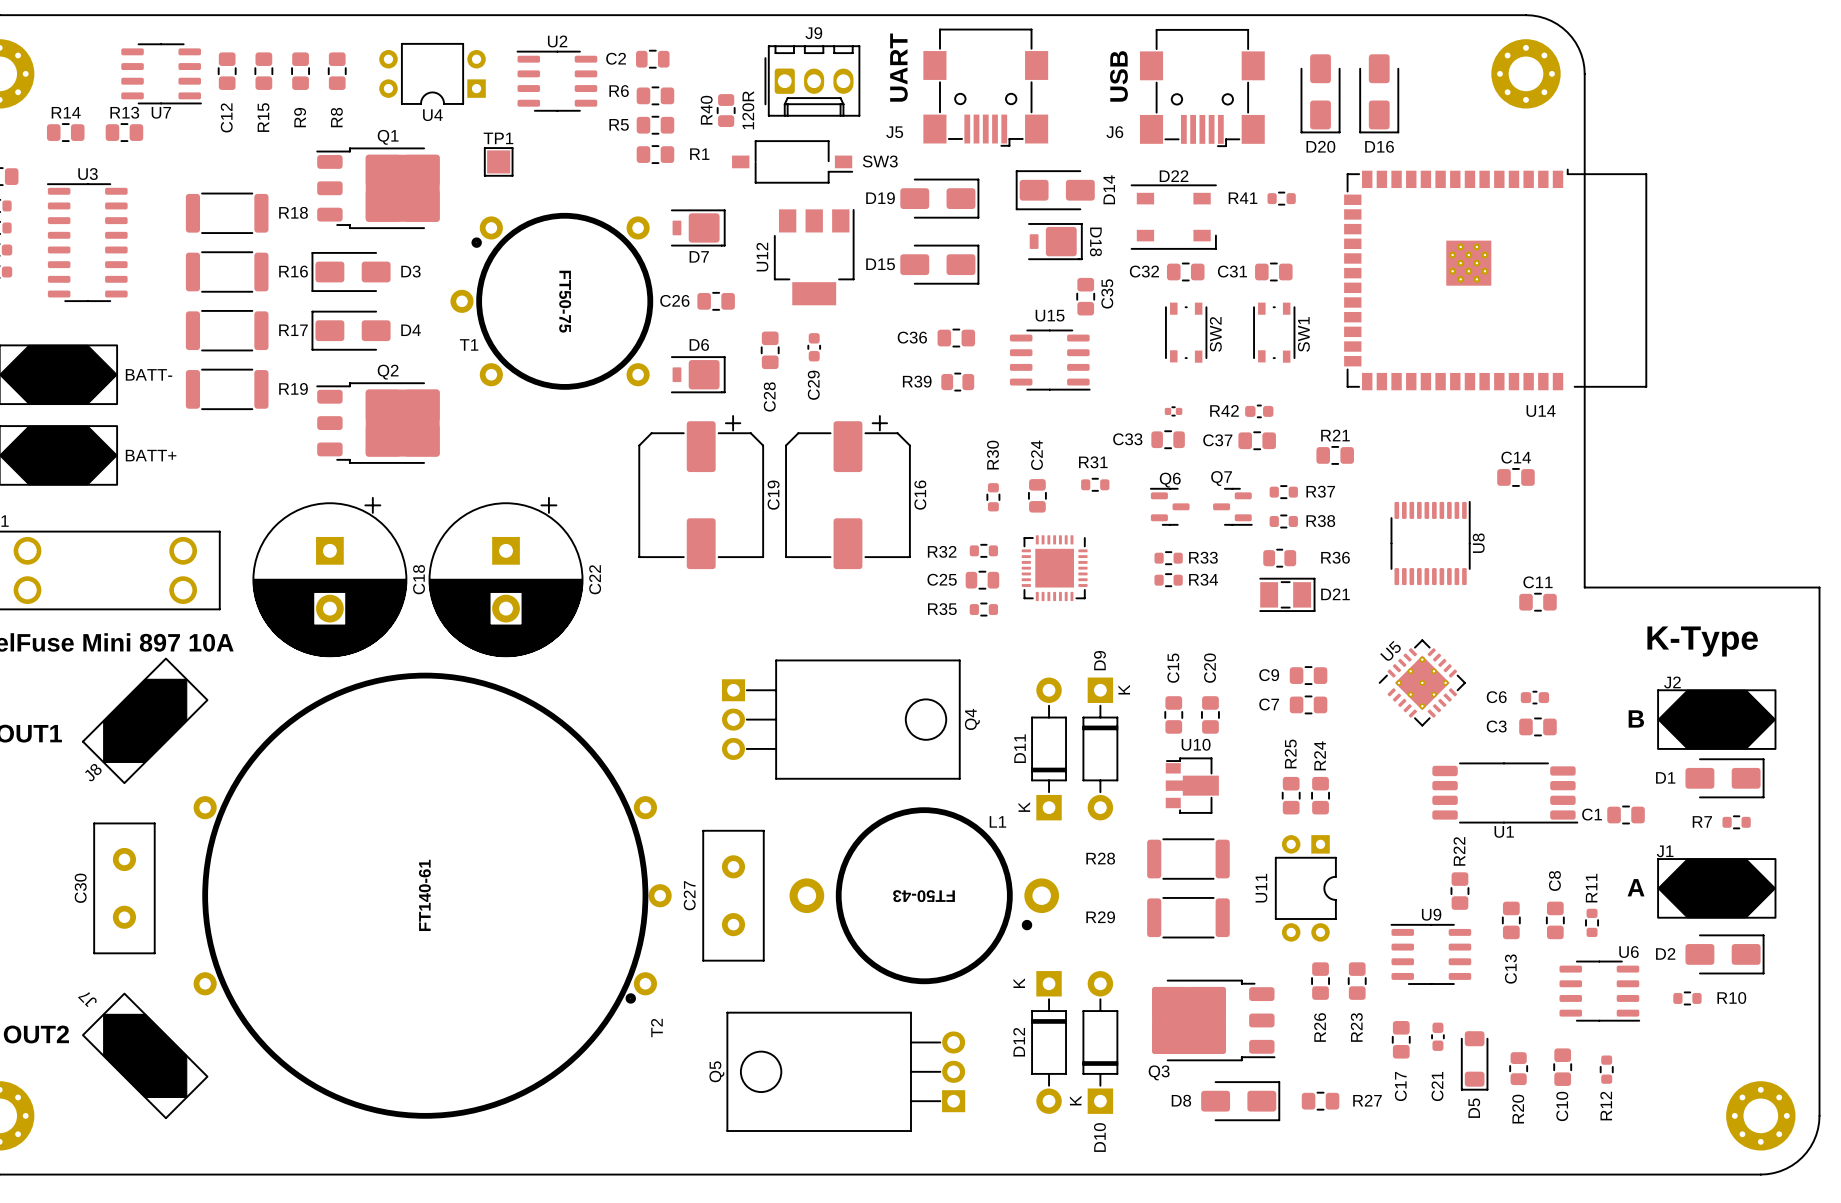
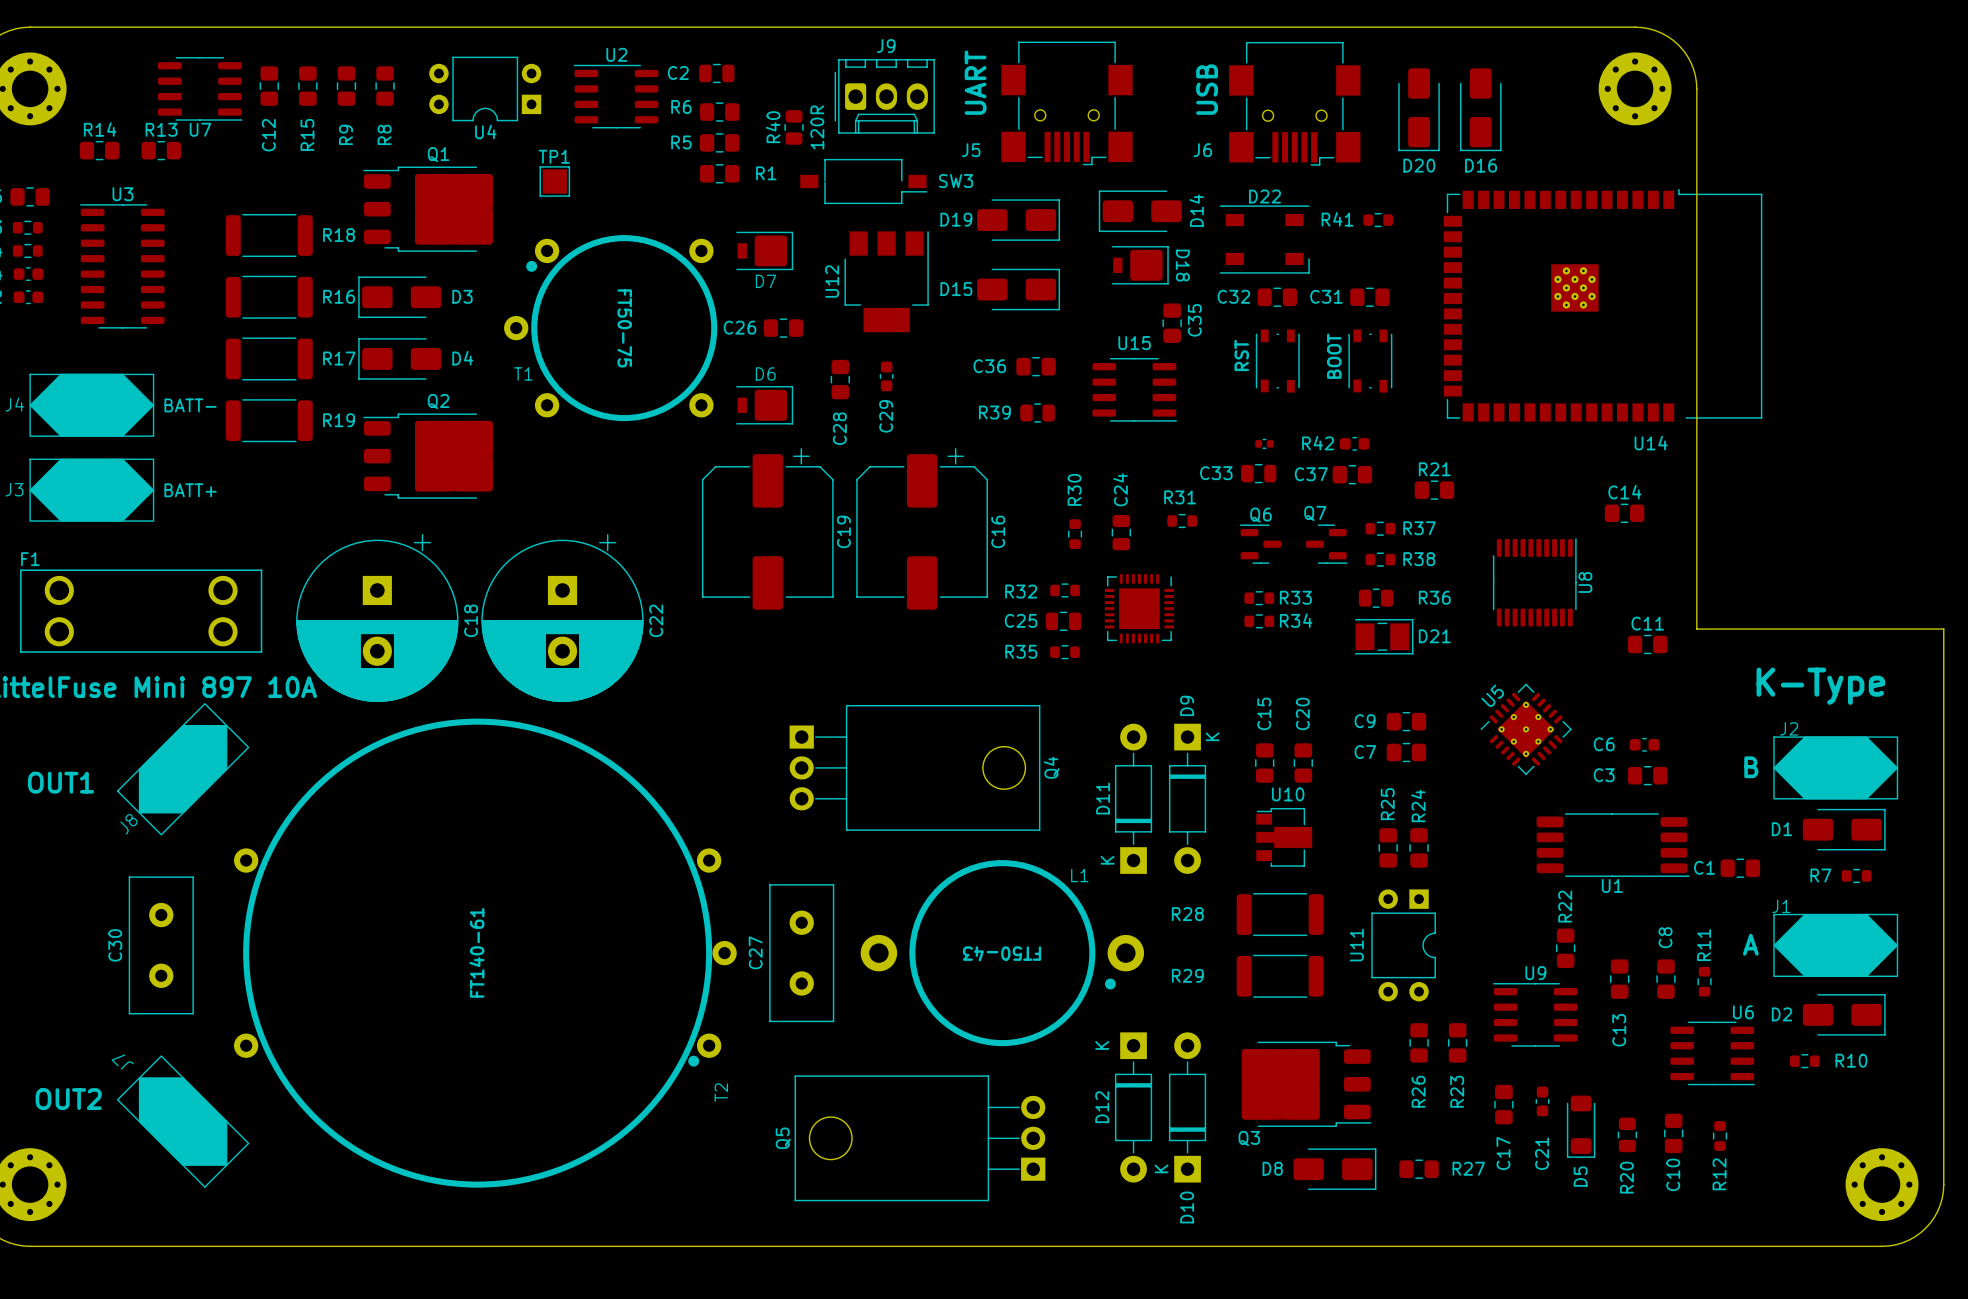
text: none -> BOOT (1334, 356)
text: none -> RST (1241, 355)
SW2 name: SW2 (1215, 334) -> none
SW1 name: SW1 (1303, 334) -> none

